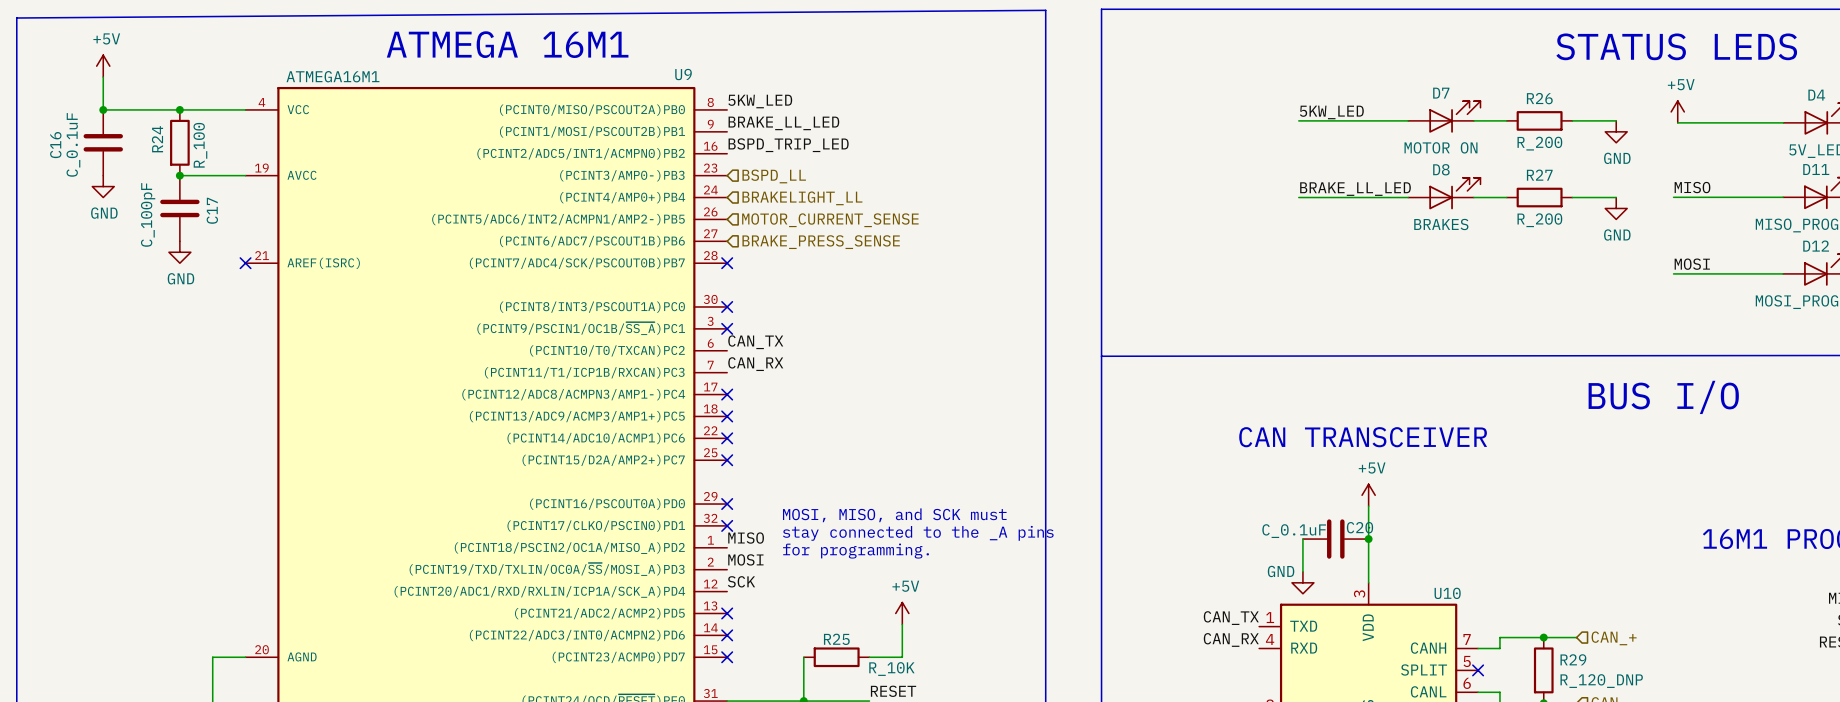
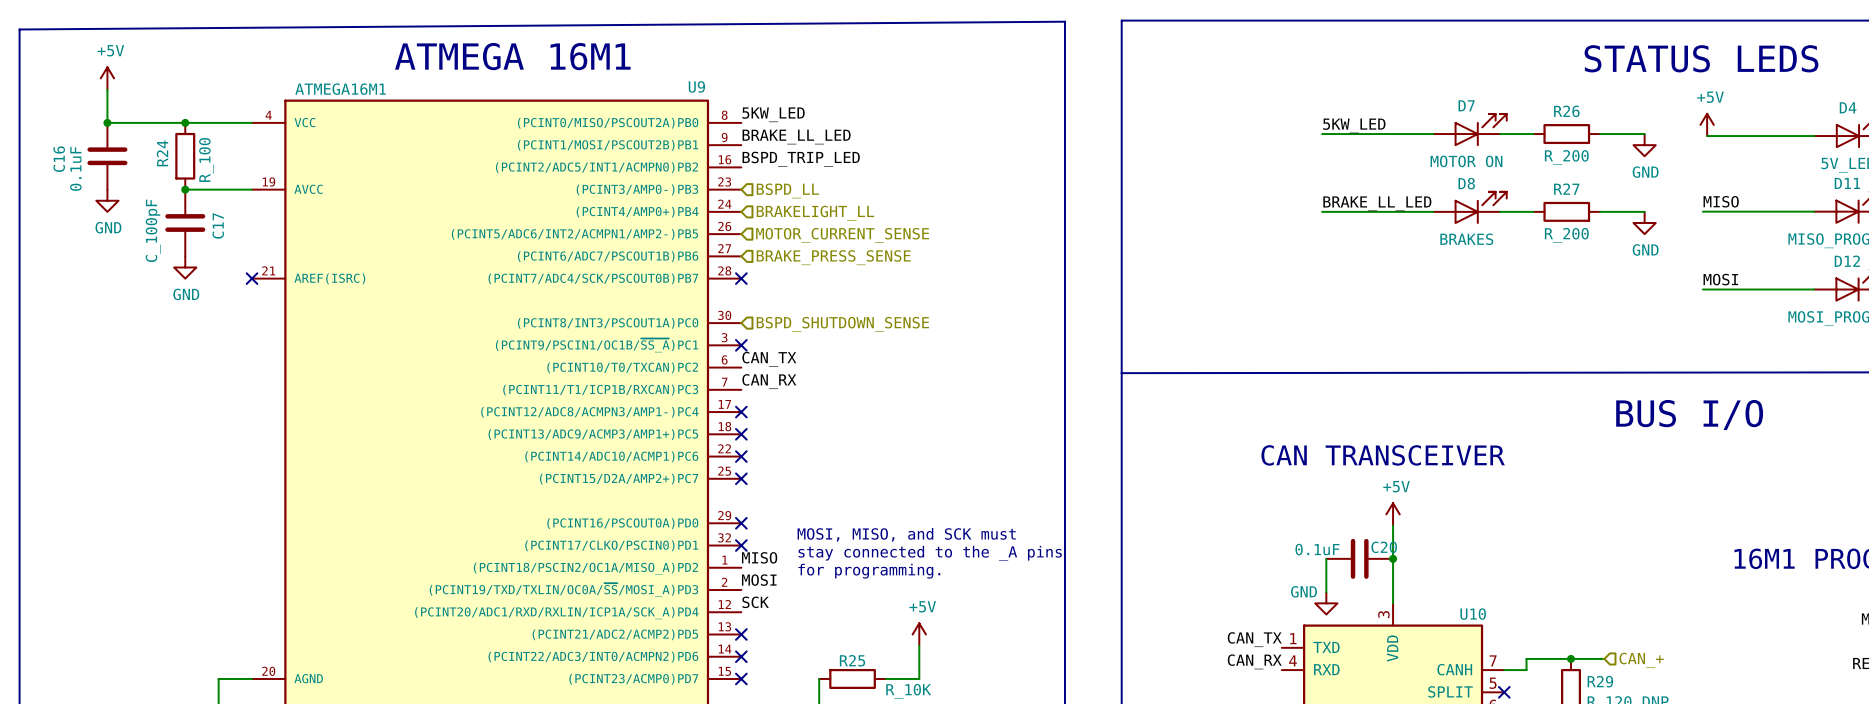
C16 value: C_0.1uF (73, 144) -> 0.1uF (75, 168)
no-connect mark: (727, 306) -> none
hierarchical label: none -> BSPD_SHUTDOWN_SENSE (842, 324)
C20 value: C_0.1uF (1294, 531) -> 0.1uF (1317, 549)

